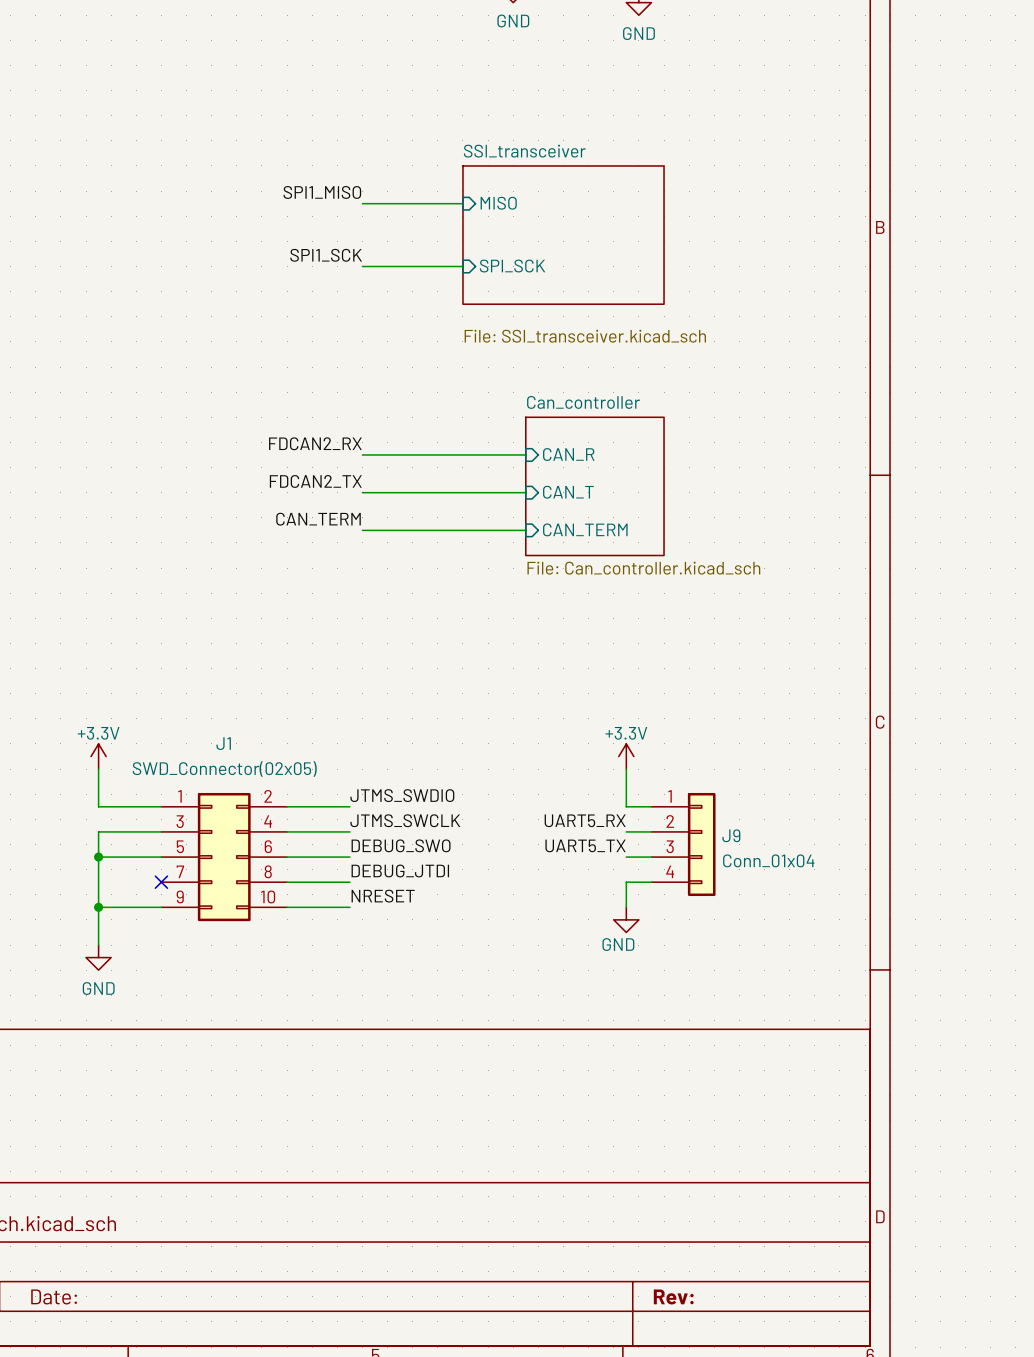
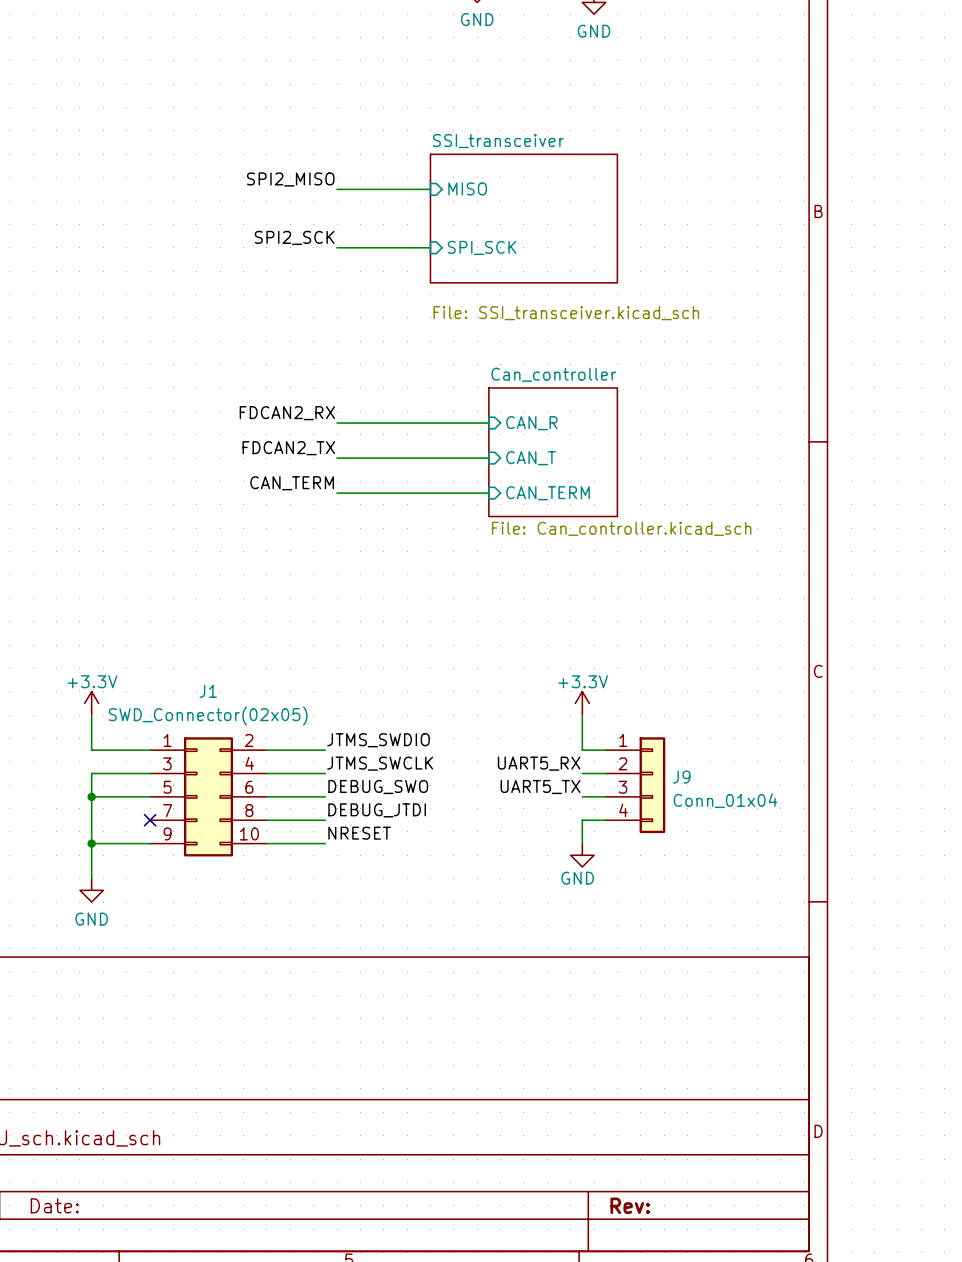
label: SPI1_MISO (322, 192) -> SPI2_MISO (290, 179)
label: SPI1_SCK (326, 255) -> SPI2_SCK (294, 237)

